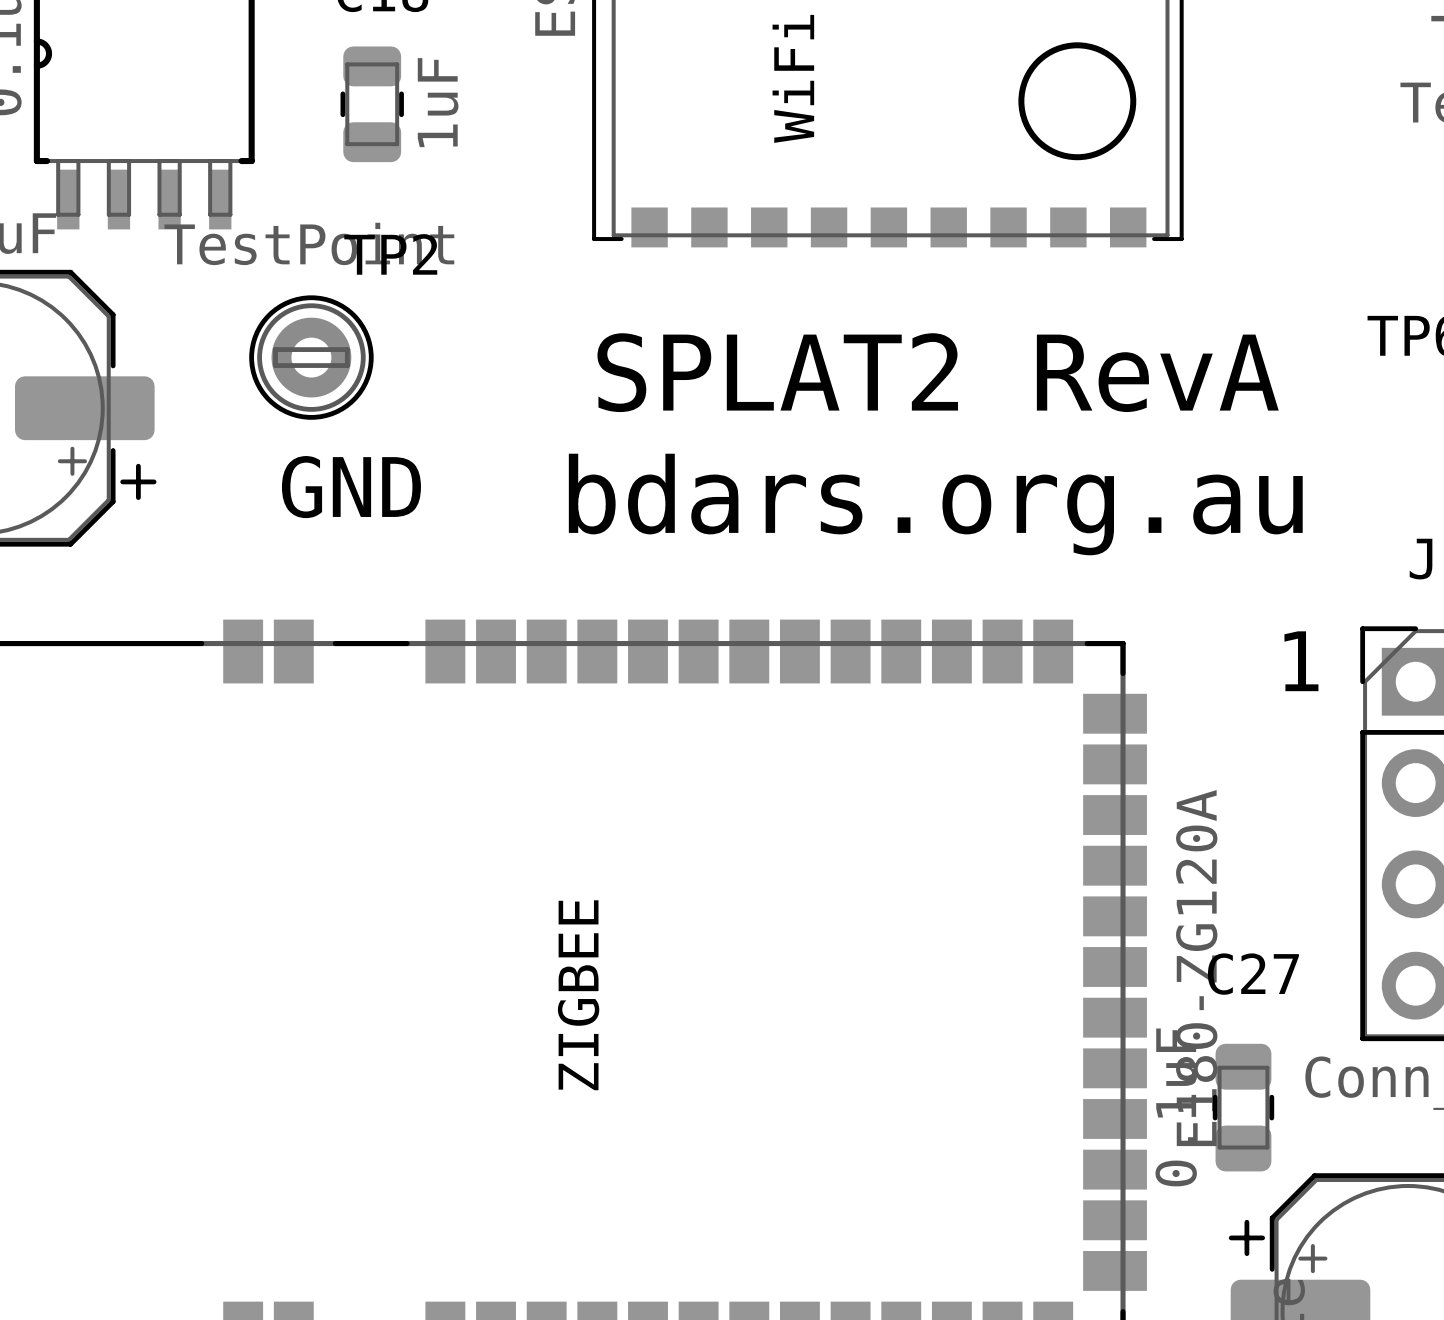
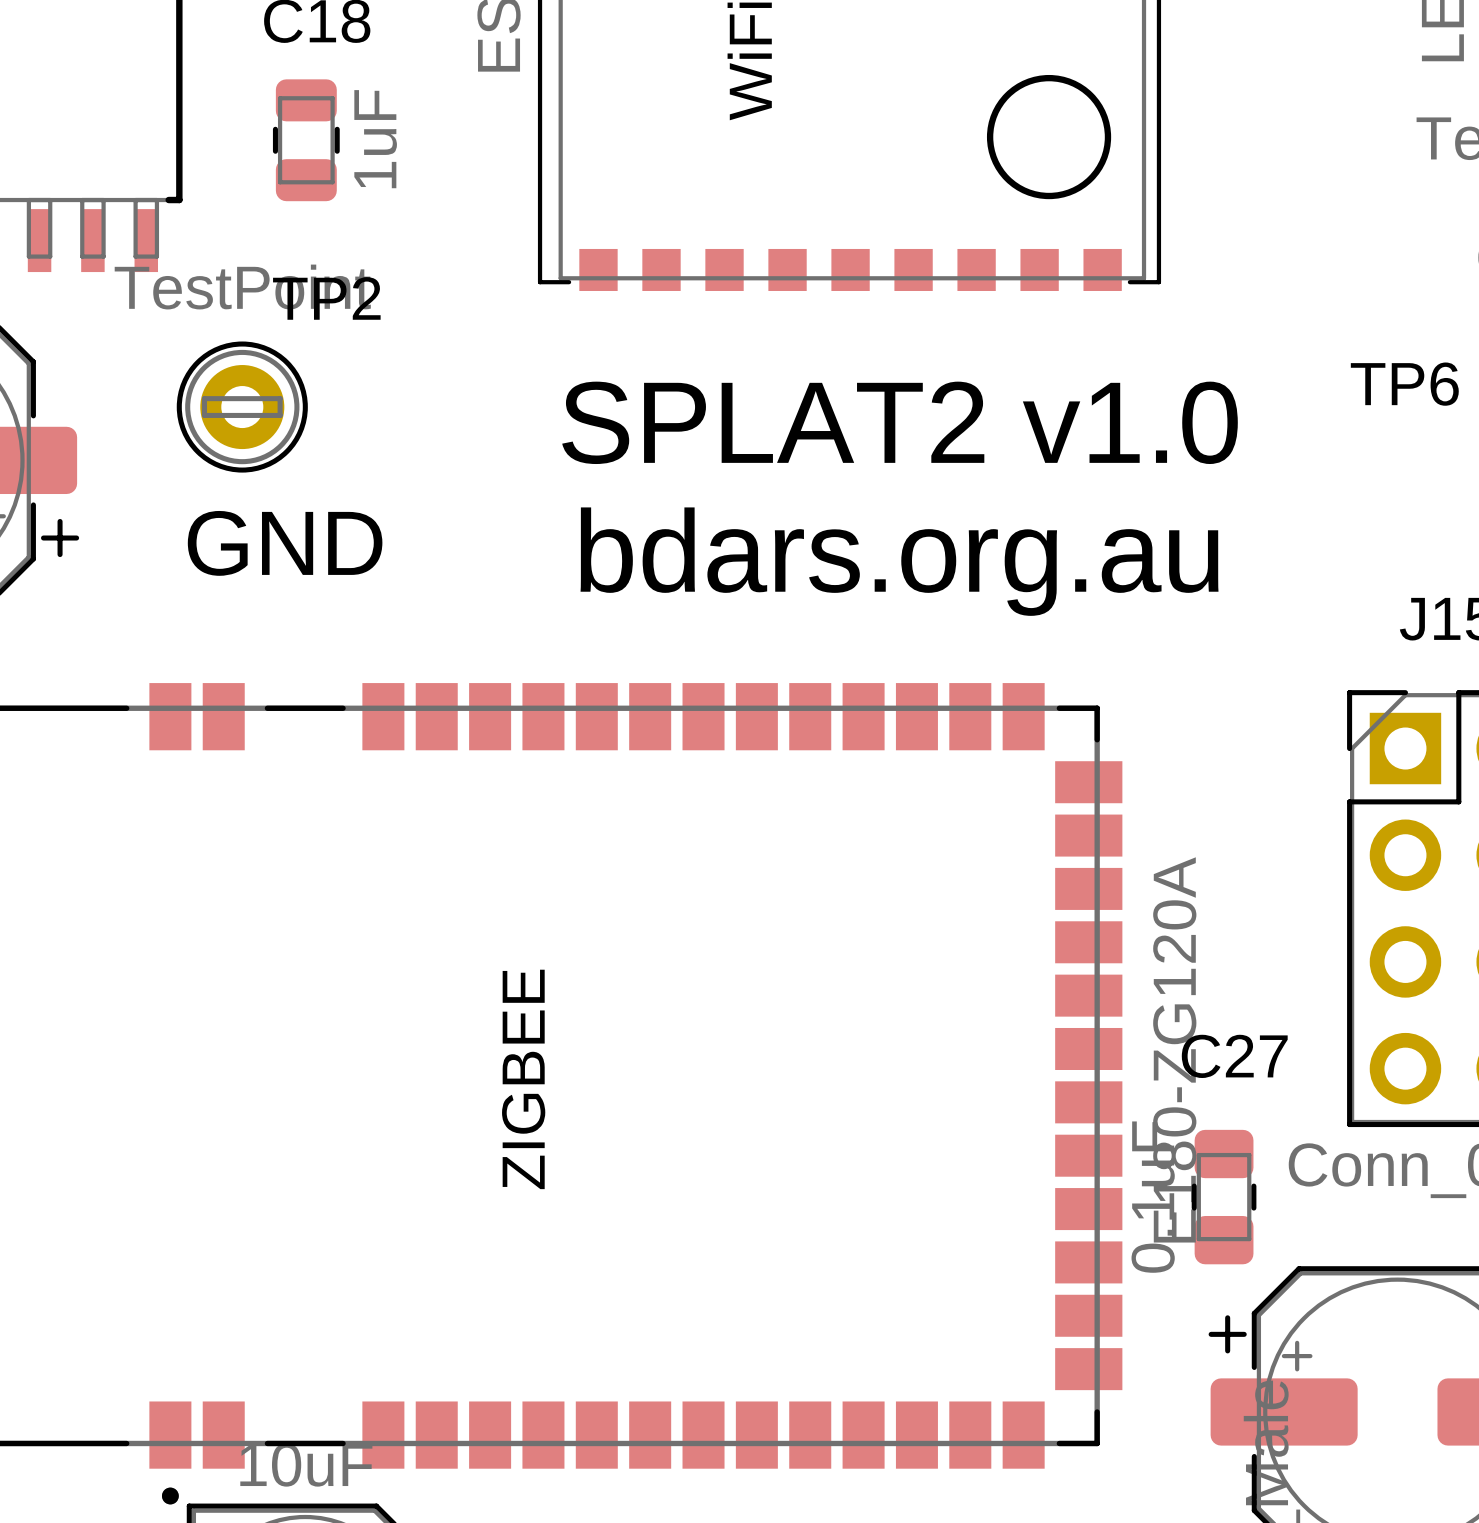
text: SPLAT2 RevA (938, 372) -> SPLAT2 v1.0 (900, 422)
text: 1 (1301, 661) -> none

